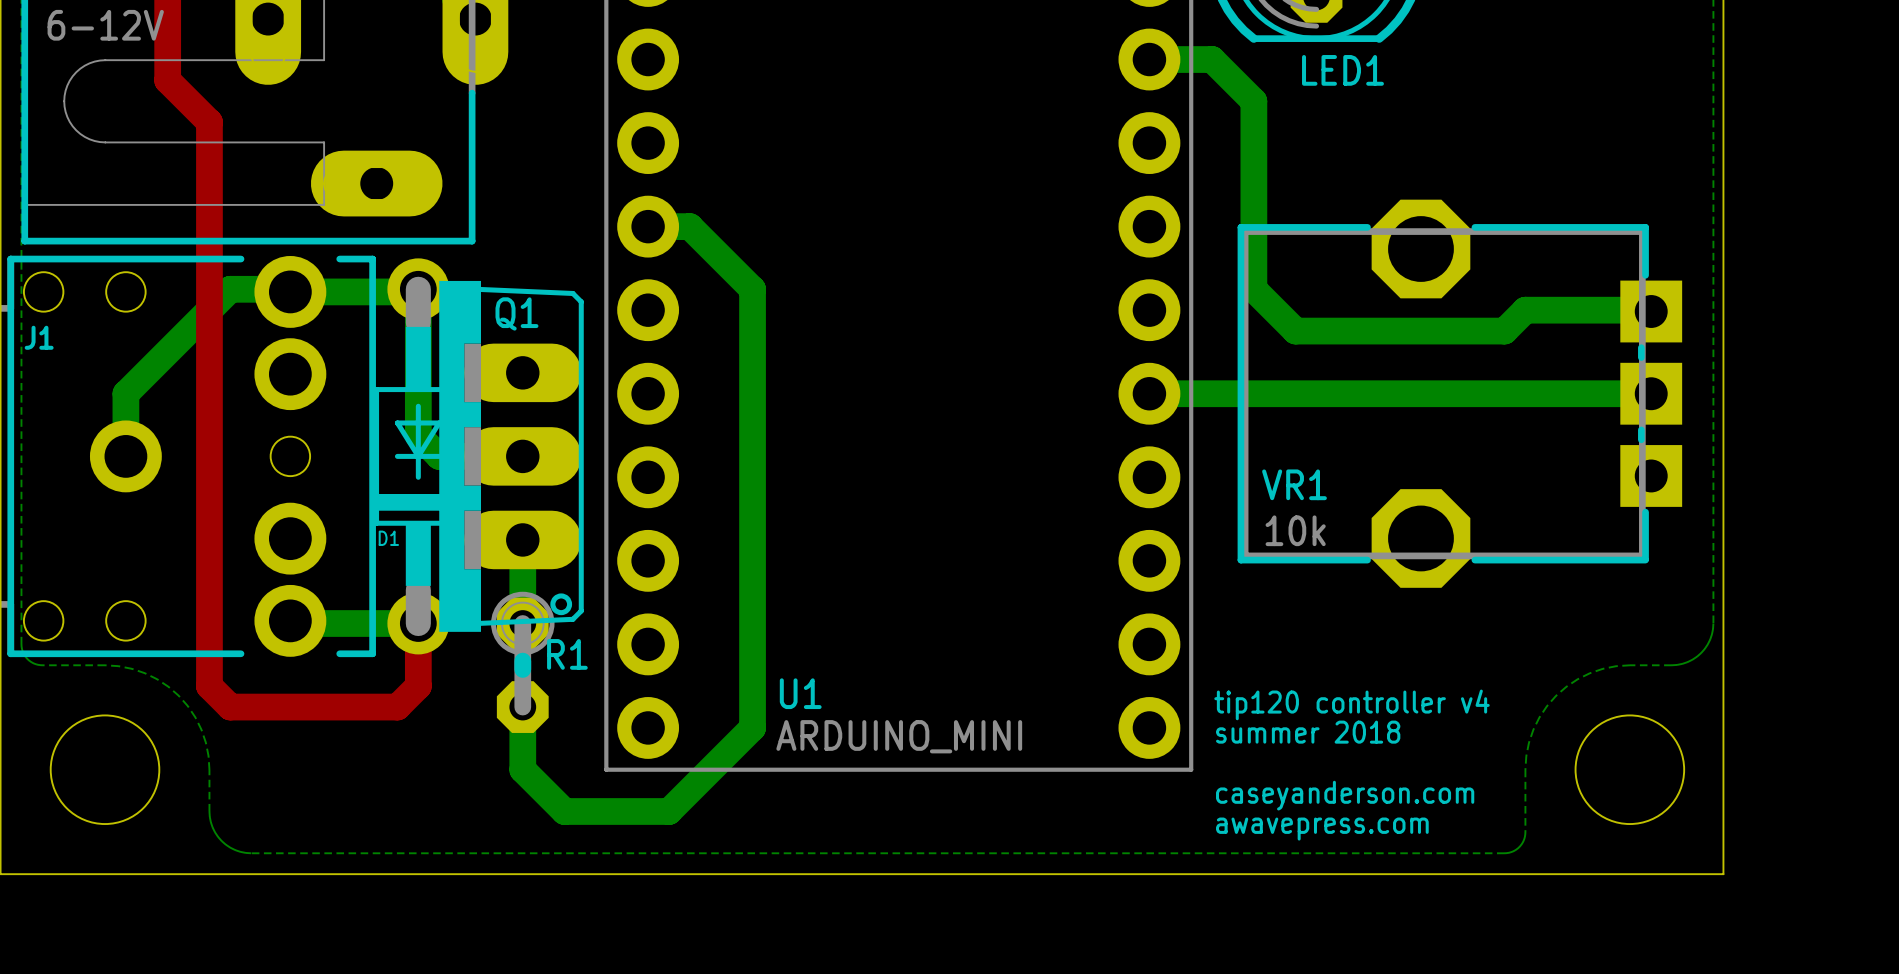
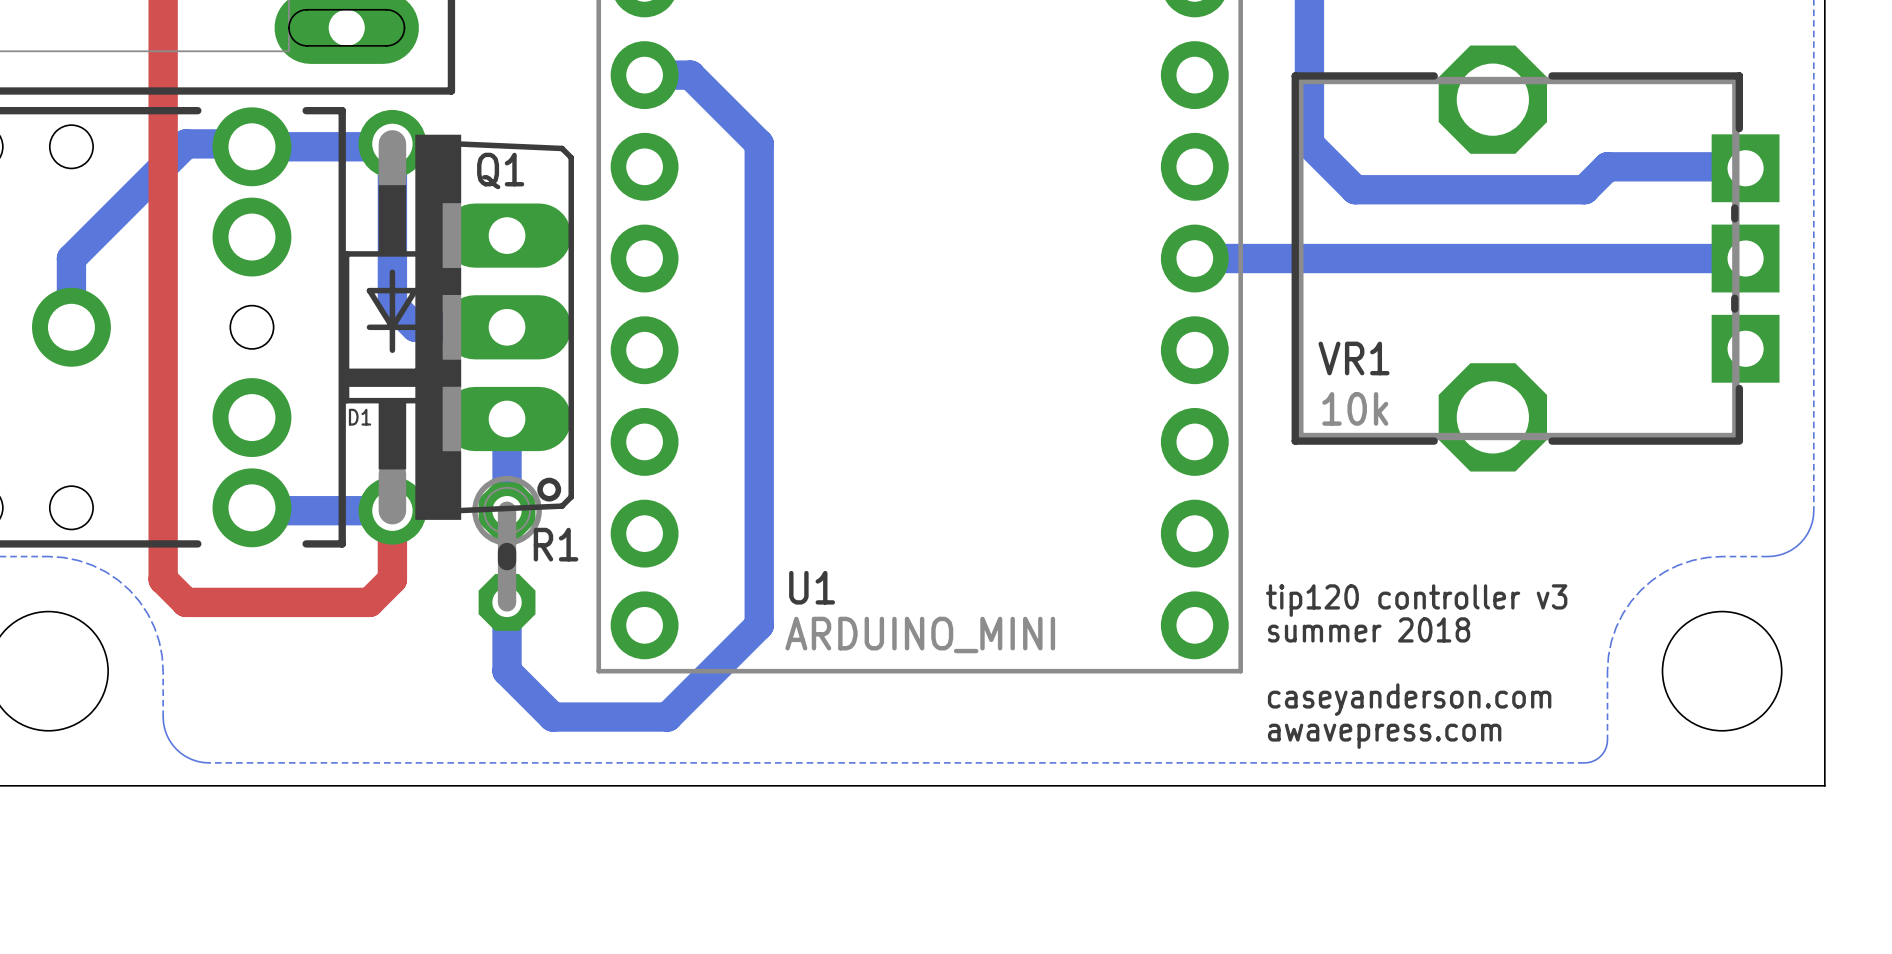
text: tip120 controller v4 (1352, 704) -> tip120 controller v3 (1416, 600)

